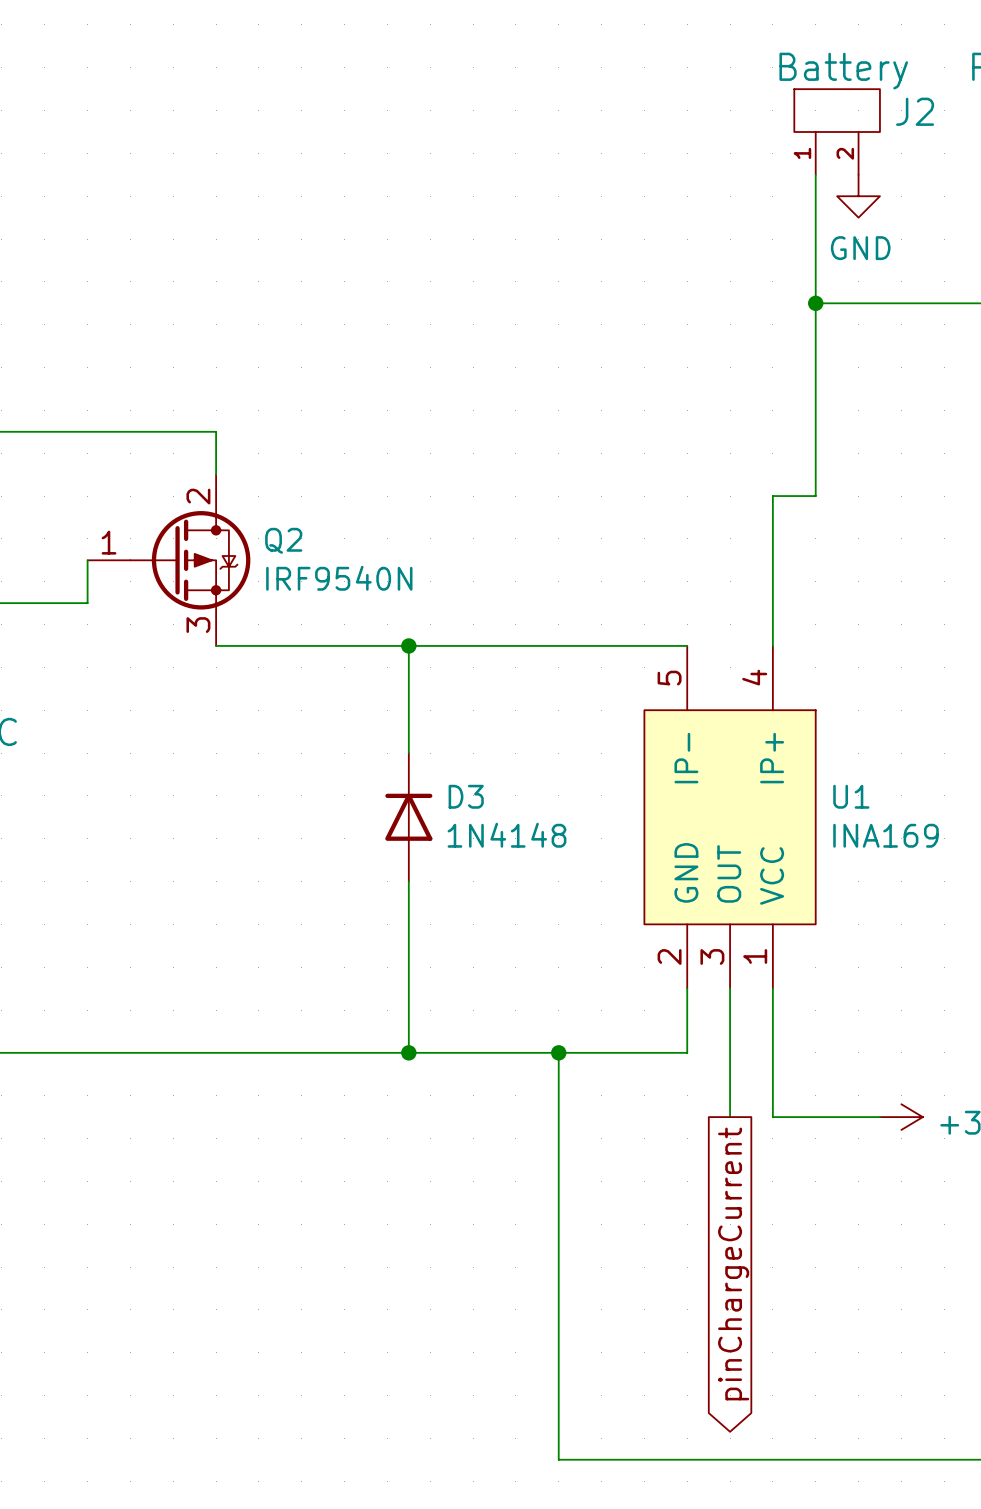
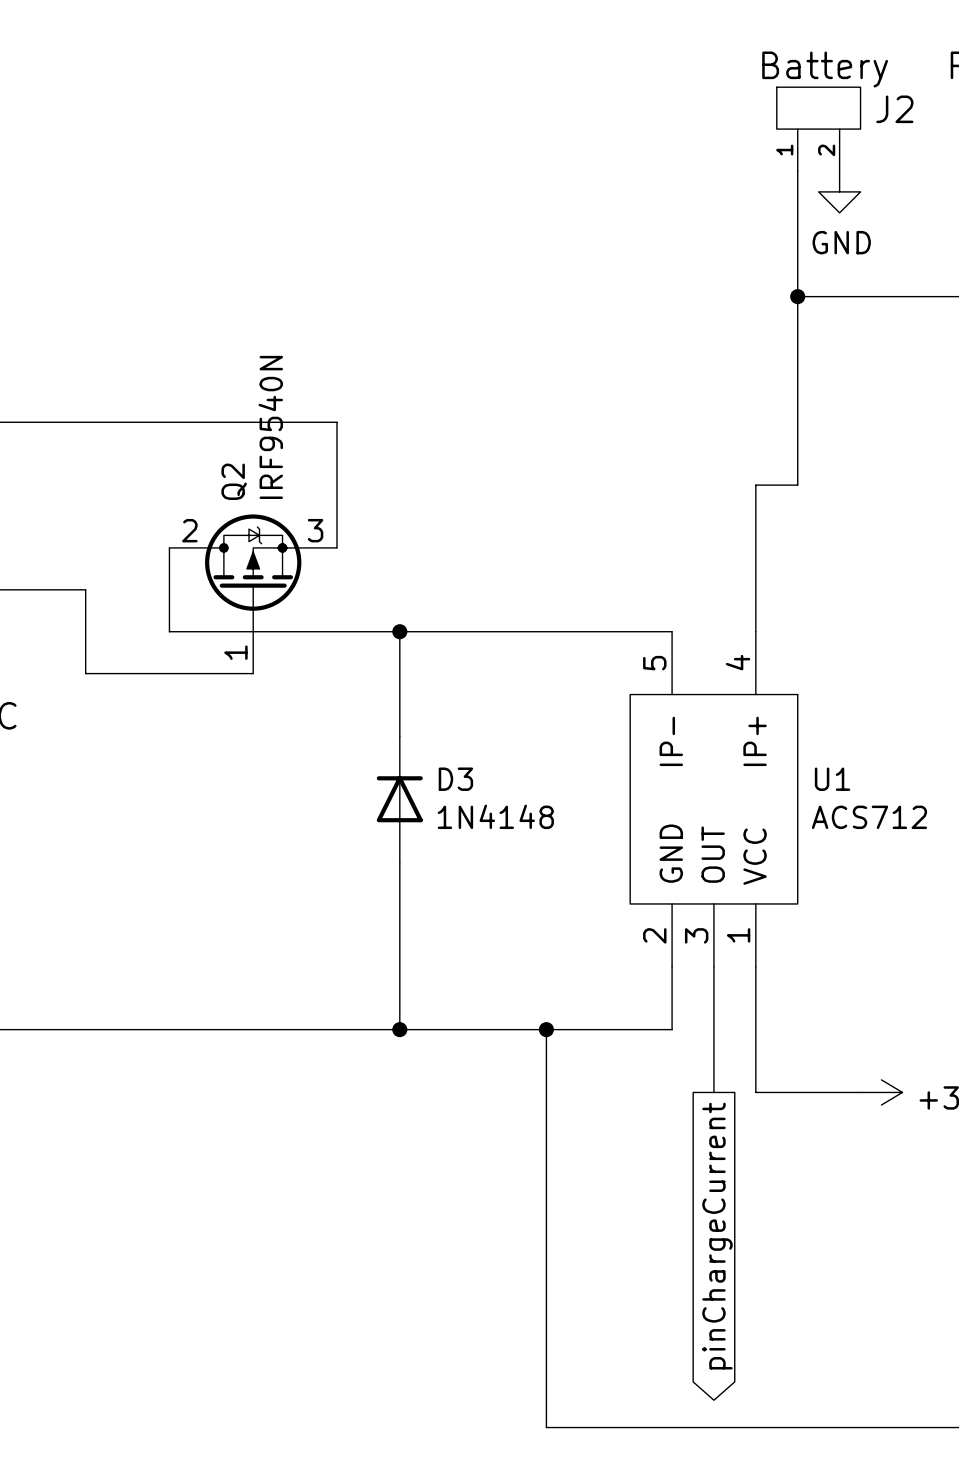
wire: (216, 431) (216, 474) -> (211, 422) (336, 422) (336, 547)
wire: (87, 560) (87, 603) -> (253, 673) (85, 673) (85, 589)
wire: none -> (169, 547) (169, 631) (211, 631)
Q2 rotation: 0° (190, 560) -> 90° counterclockwise (253, 573)
U1 value: INA169 (886, 835) -> ACS712 (869, 817)

